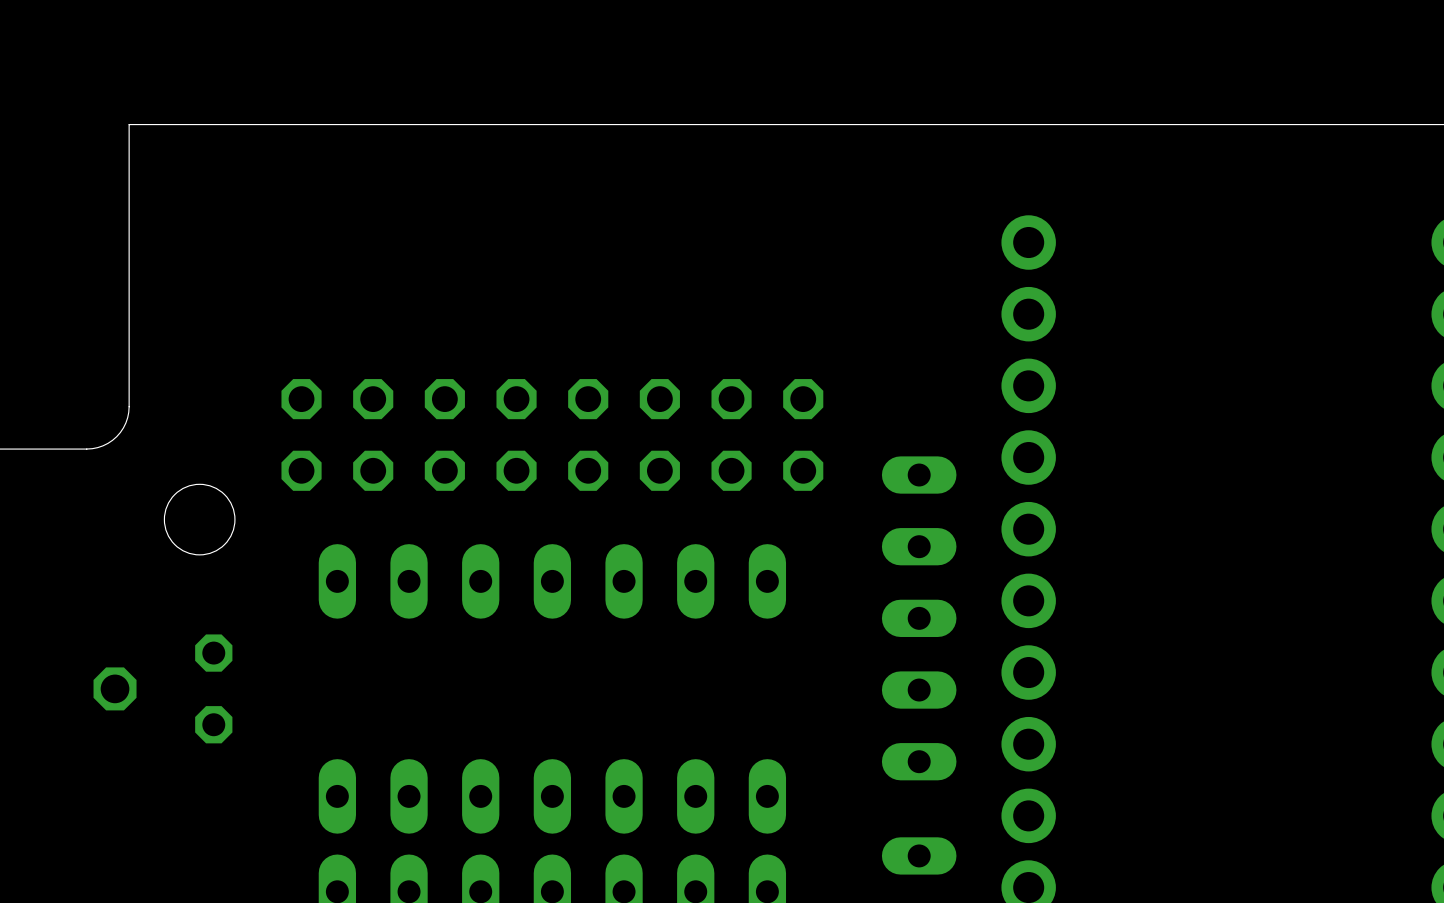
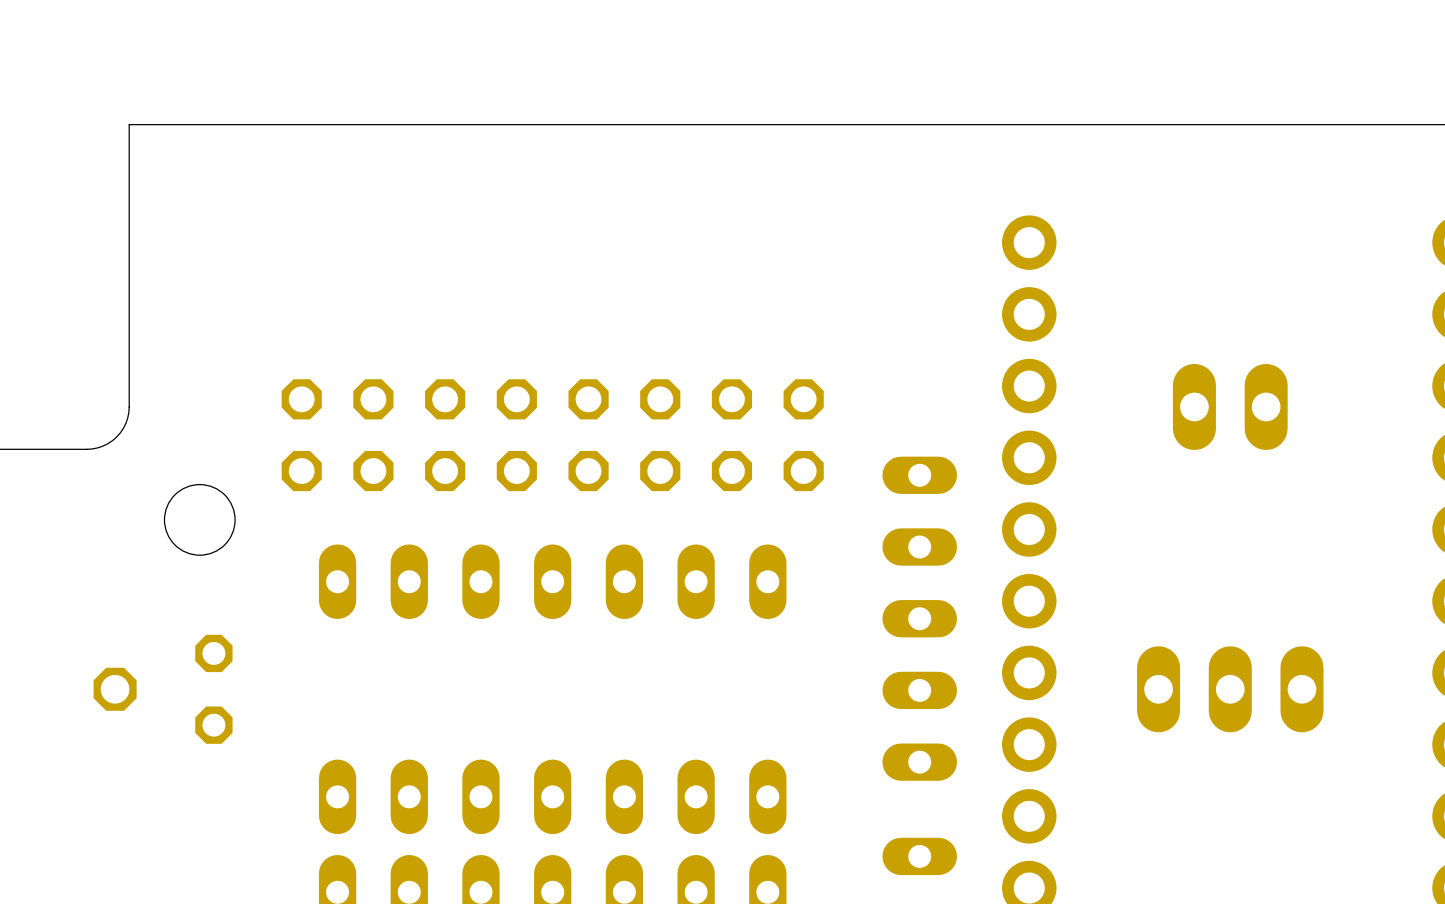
part: none -> (1230, 406)
part: none -> (1230, 689)

